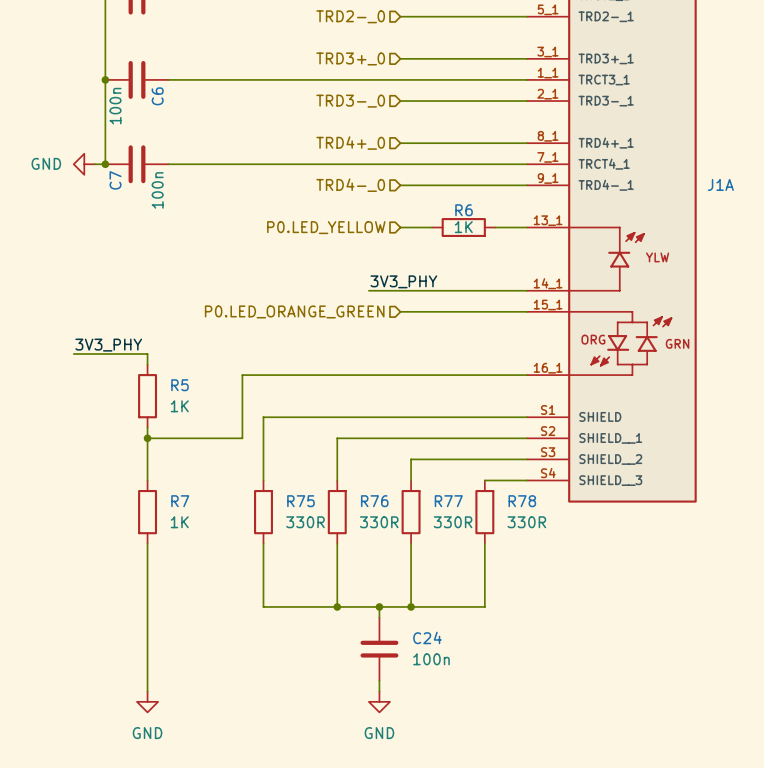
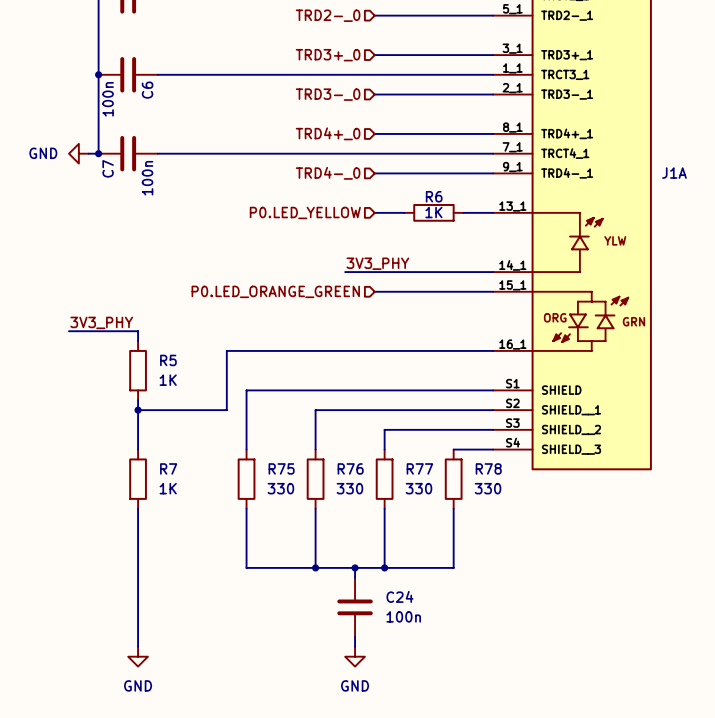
R75 value: 330R (305, 522) -> 330 (280, 488)
R76 value: 330R (379, 522) -> 330 (349, 488)
R77 value: 330R (453, 522) -> 330 (418, 488)
R78 value: 330R (526, 522) -> 330 (488, 488)

